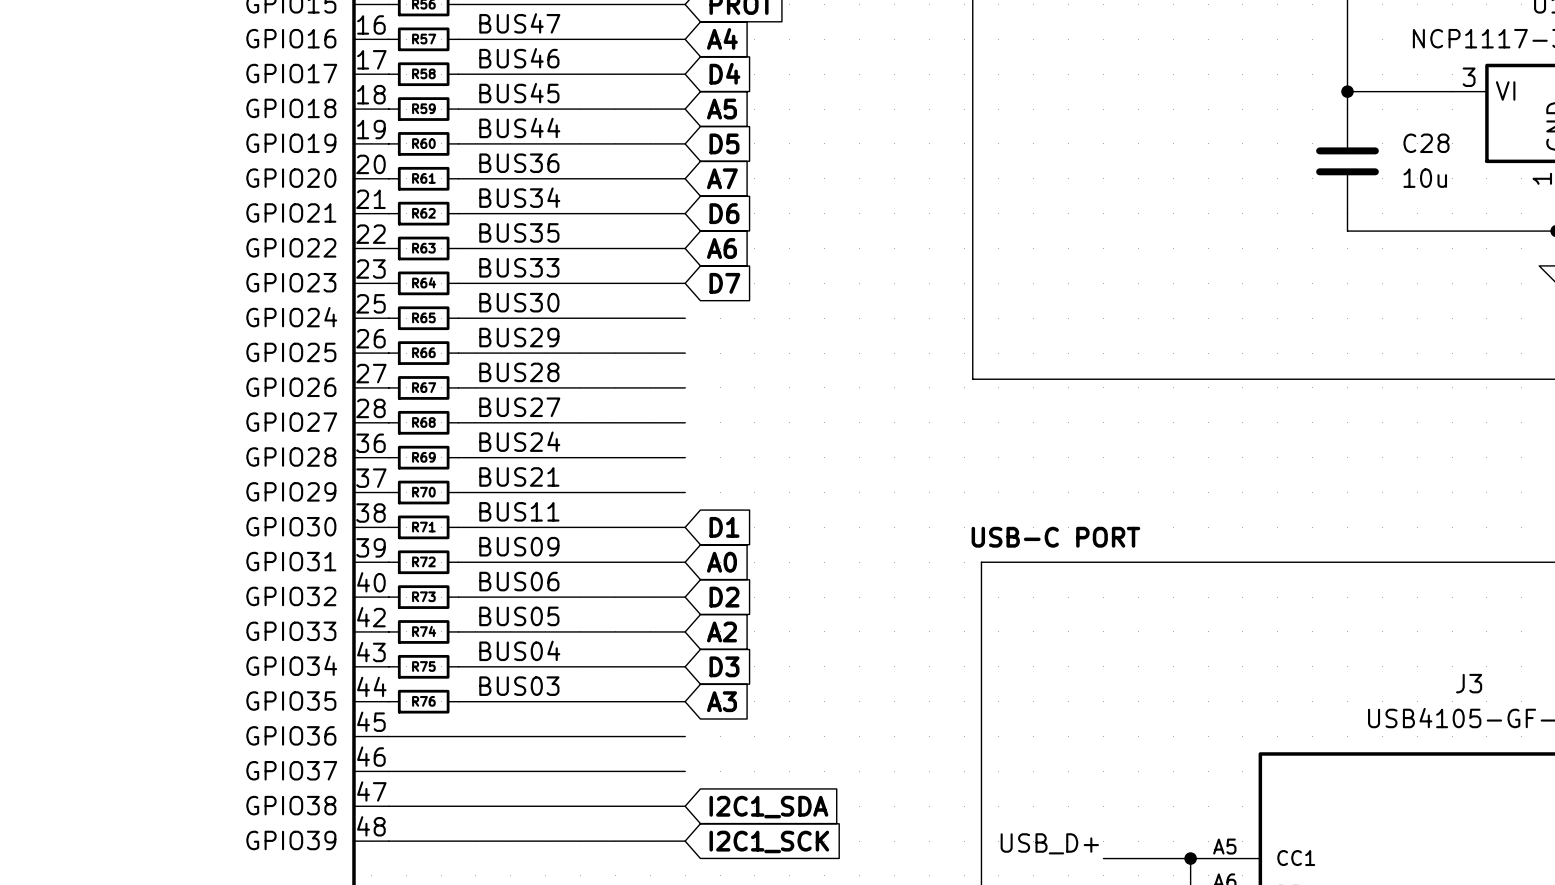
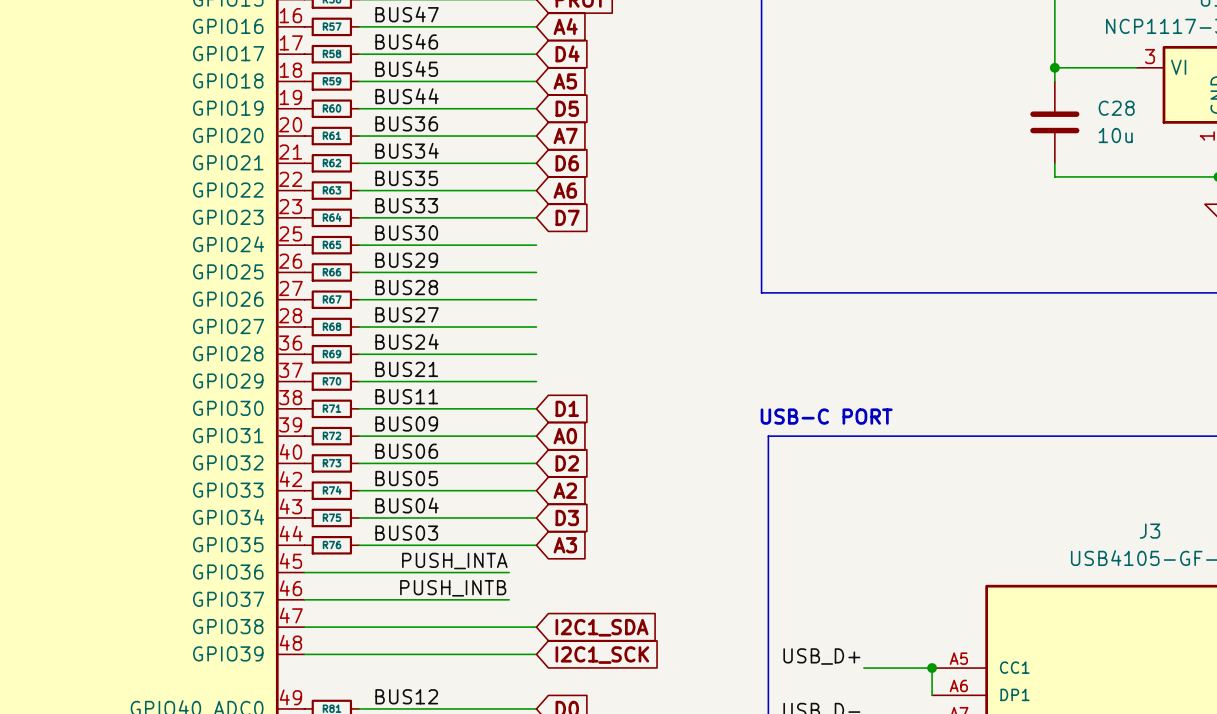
label: none -> PUSH_INTA (454, 561)
wire: (650, 736) (685, 736) -> none
label: none -> PUSH_INTB (453, 588)
wire: (650, 771) (685, 771) -> none

